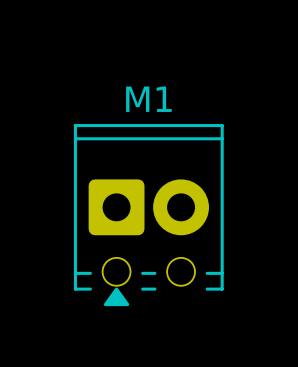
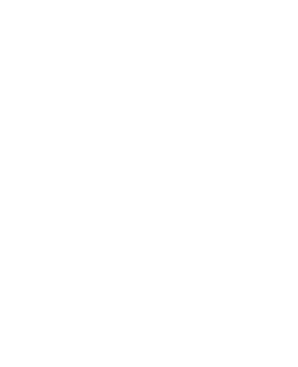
M1: (148, 215) -> none

